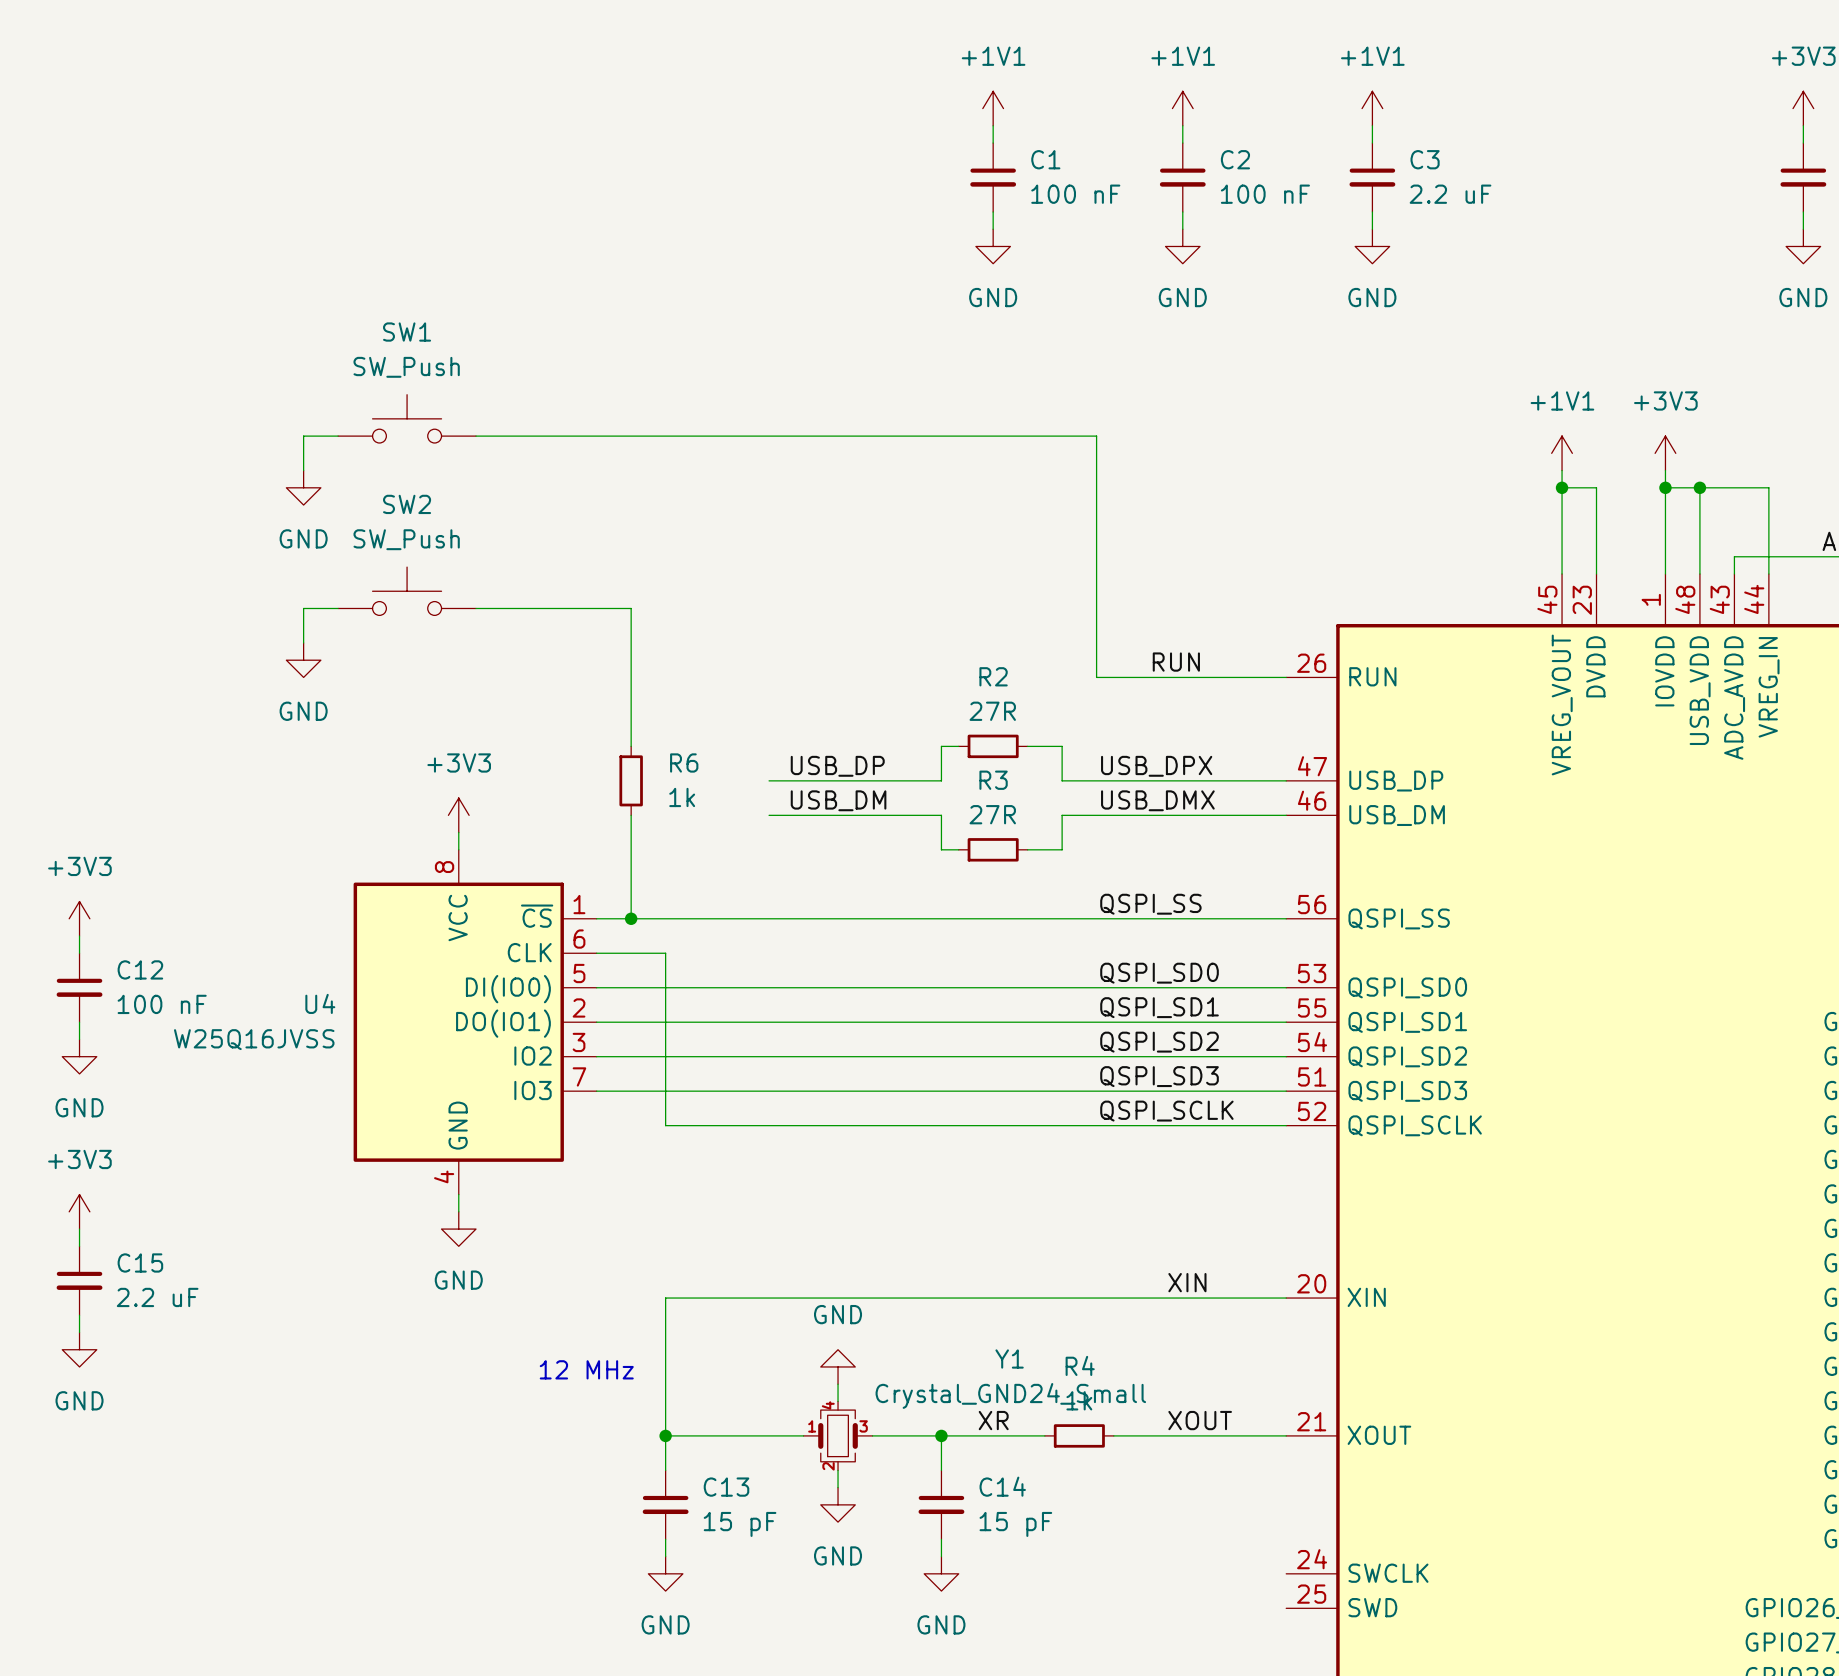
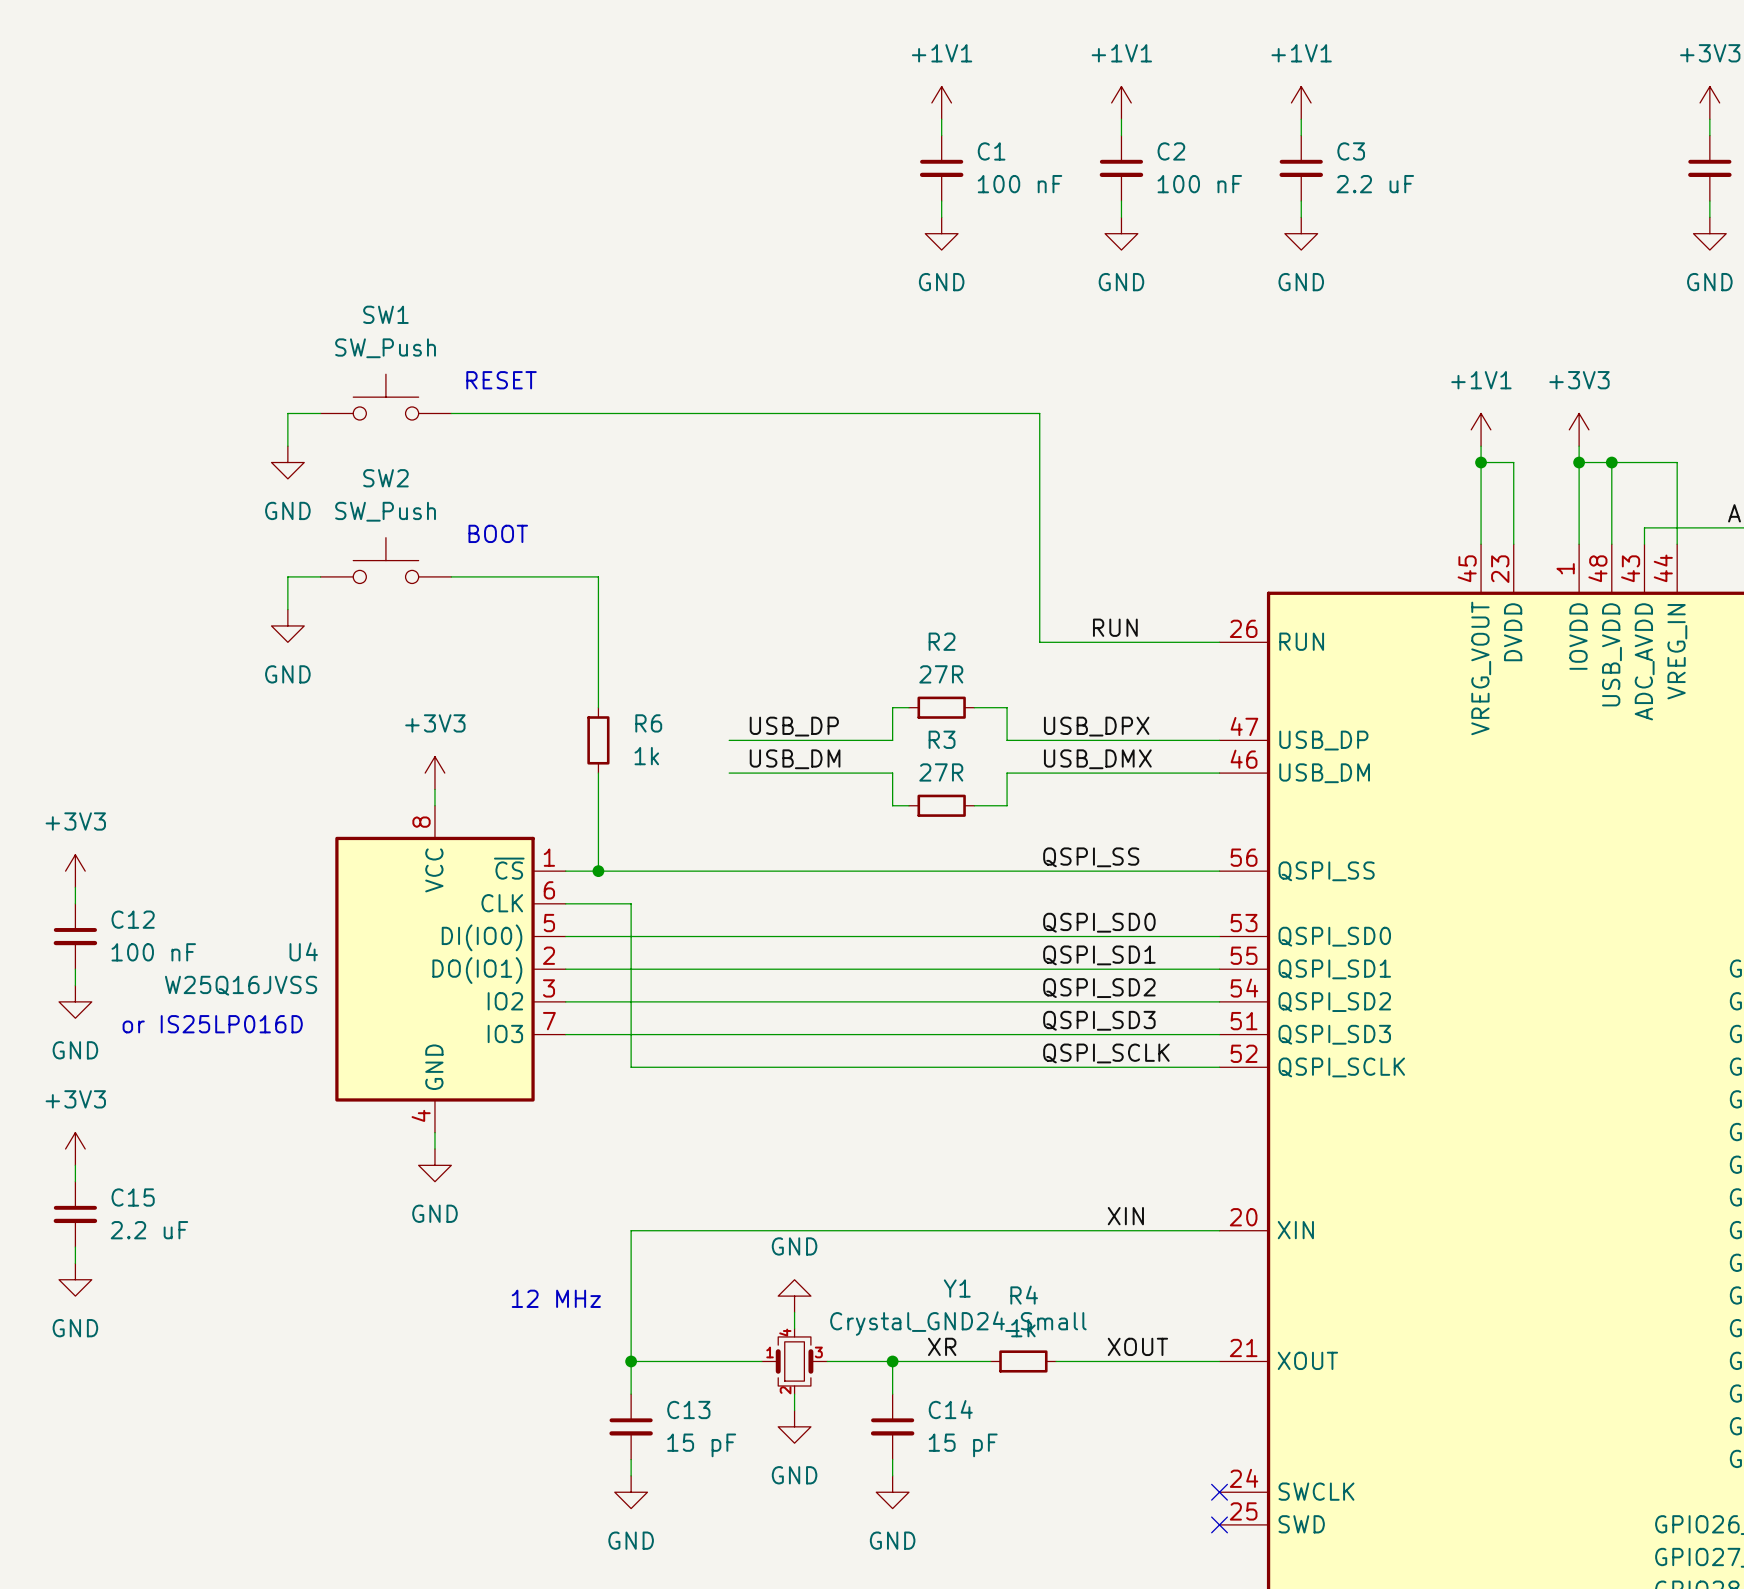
text: none -> RESET (501, 380)
text: none -> BOOT (498, 533)
text: none -> or IS25LP016D (212, 1024)
no-connect mark: none -> (1219, 1492)
no-connect mark: none -> (1219, 1524)

